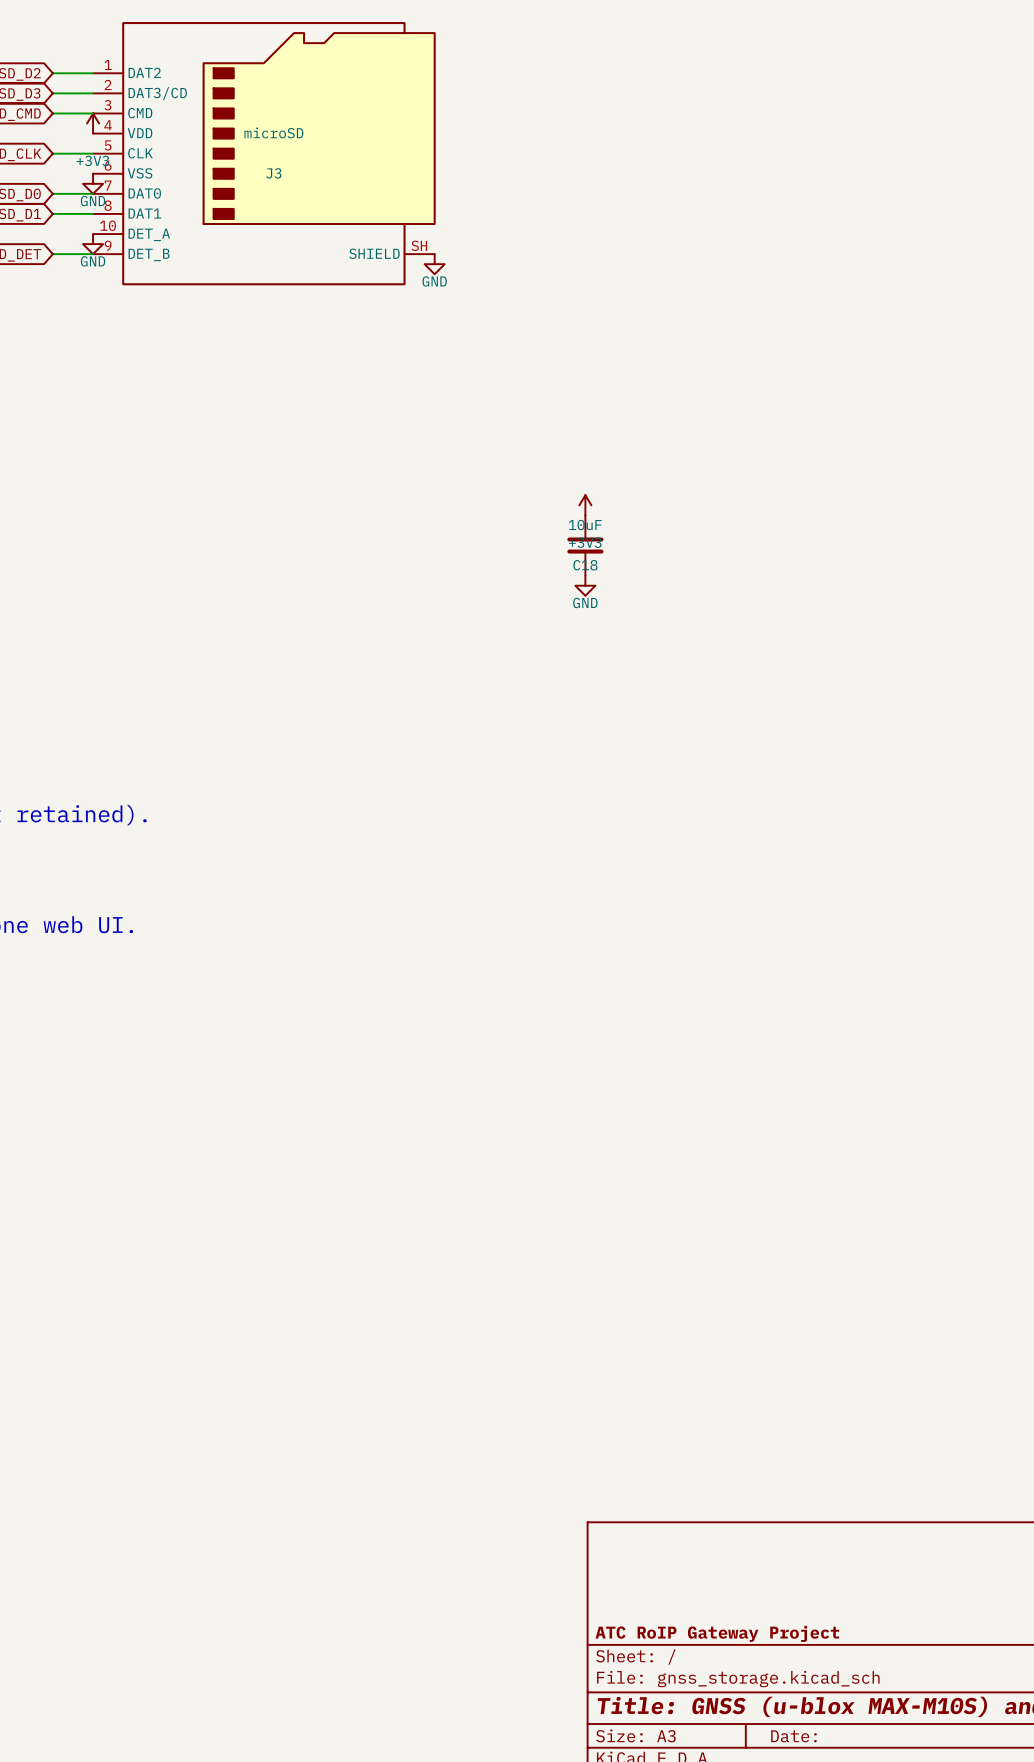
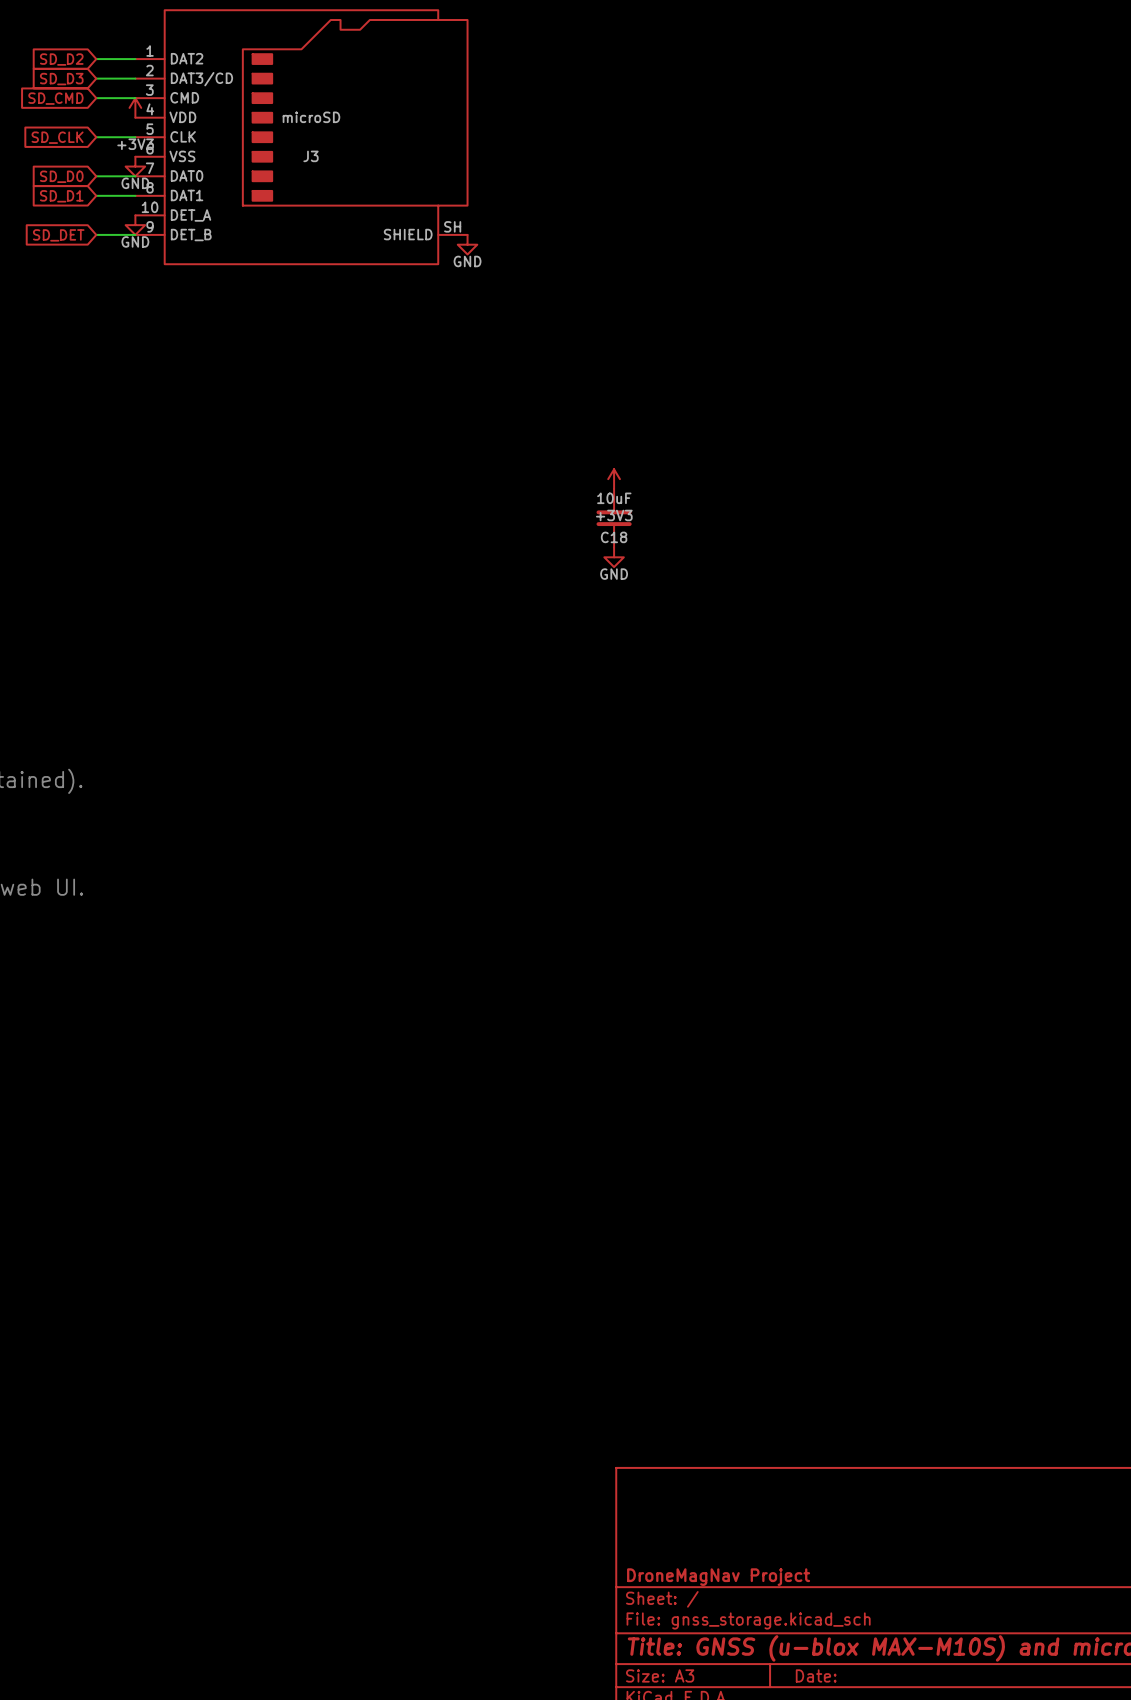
title block: ATC RoIP Gateway Project (717, 1633) -> DroneMagNav Project (718, 1577)

